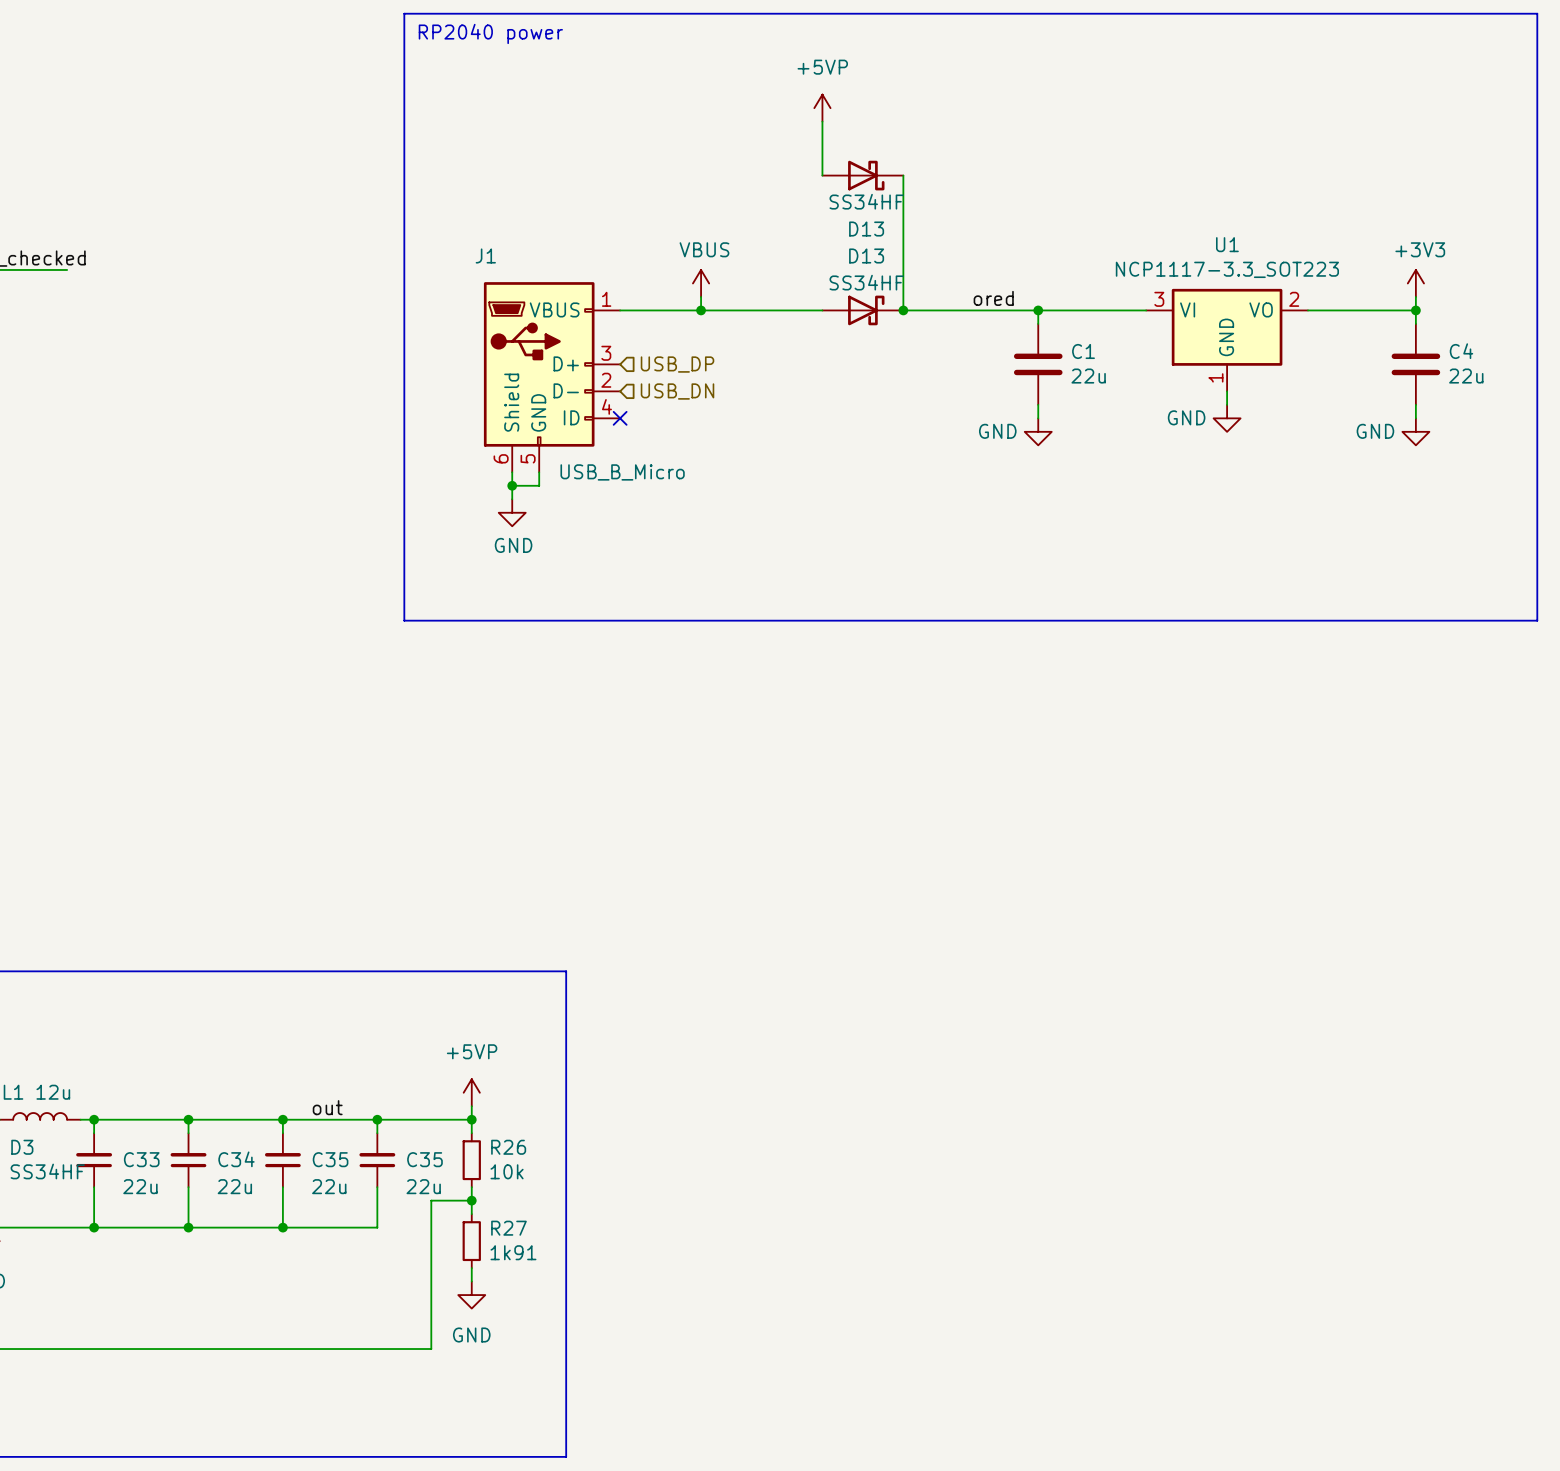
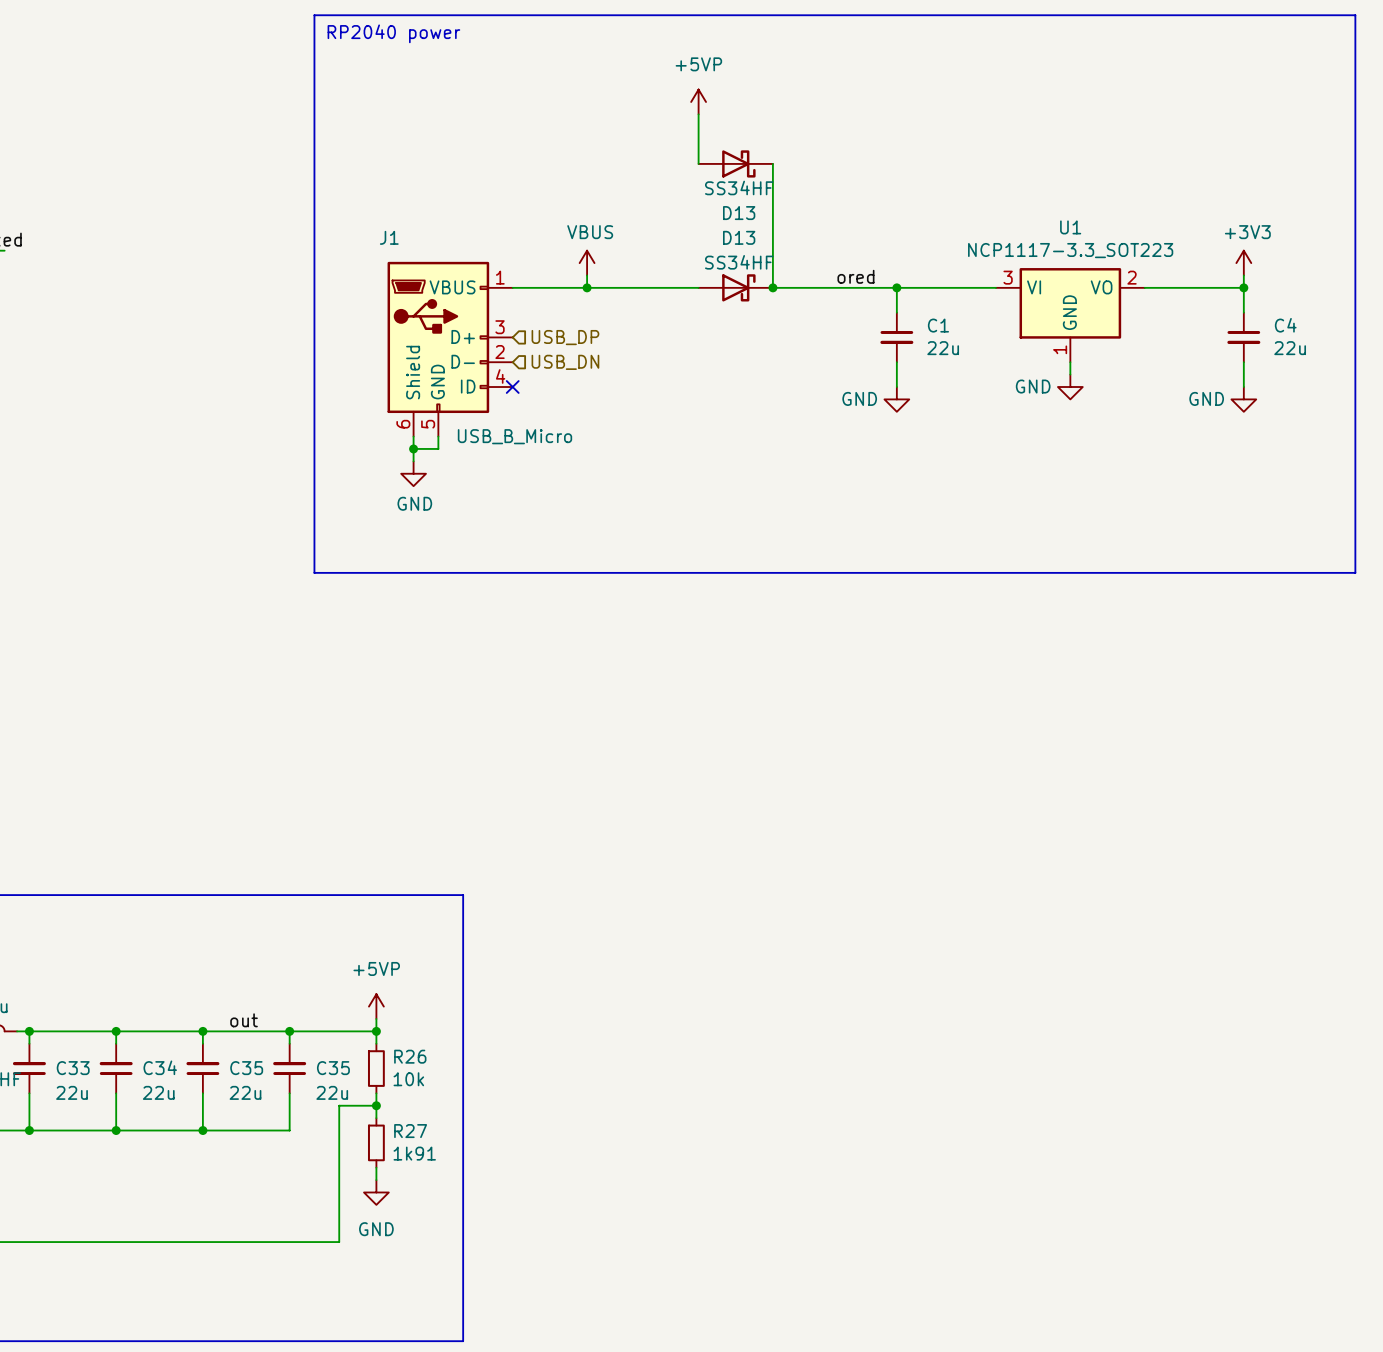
C1 symbol: [1013, 323, 1063, 405] -> [880, 312, 914, 363]
C4 symbol: [1391, 323, 1441, 405] -> [1227, 312, 1261, 363]

